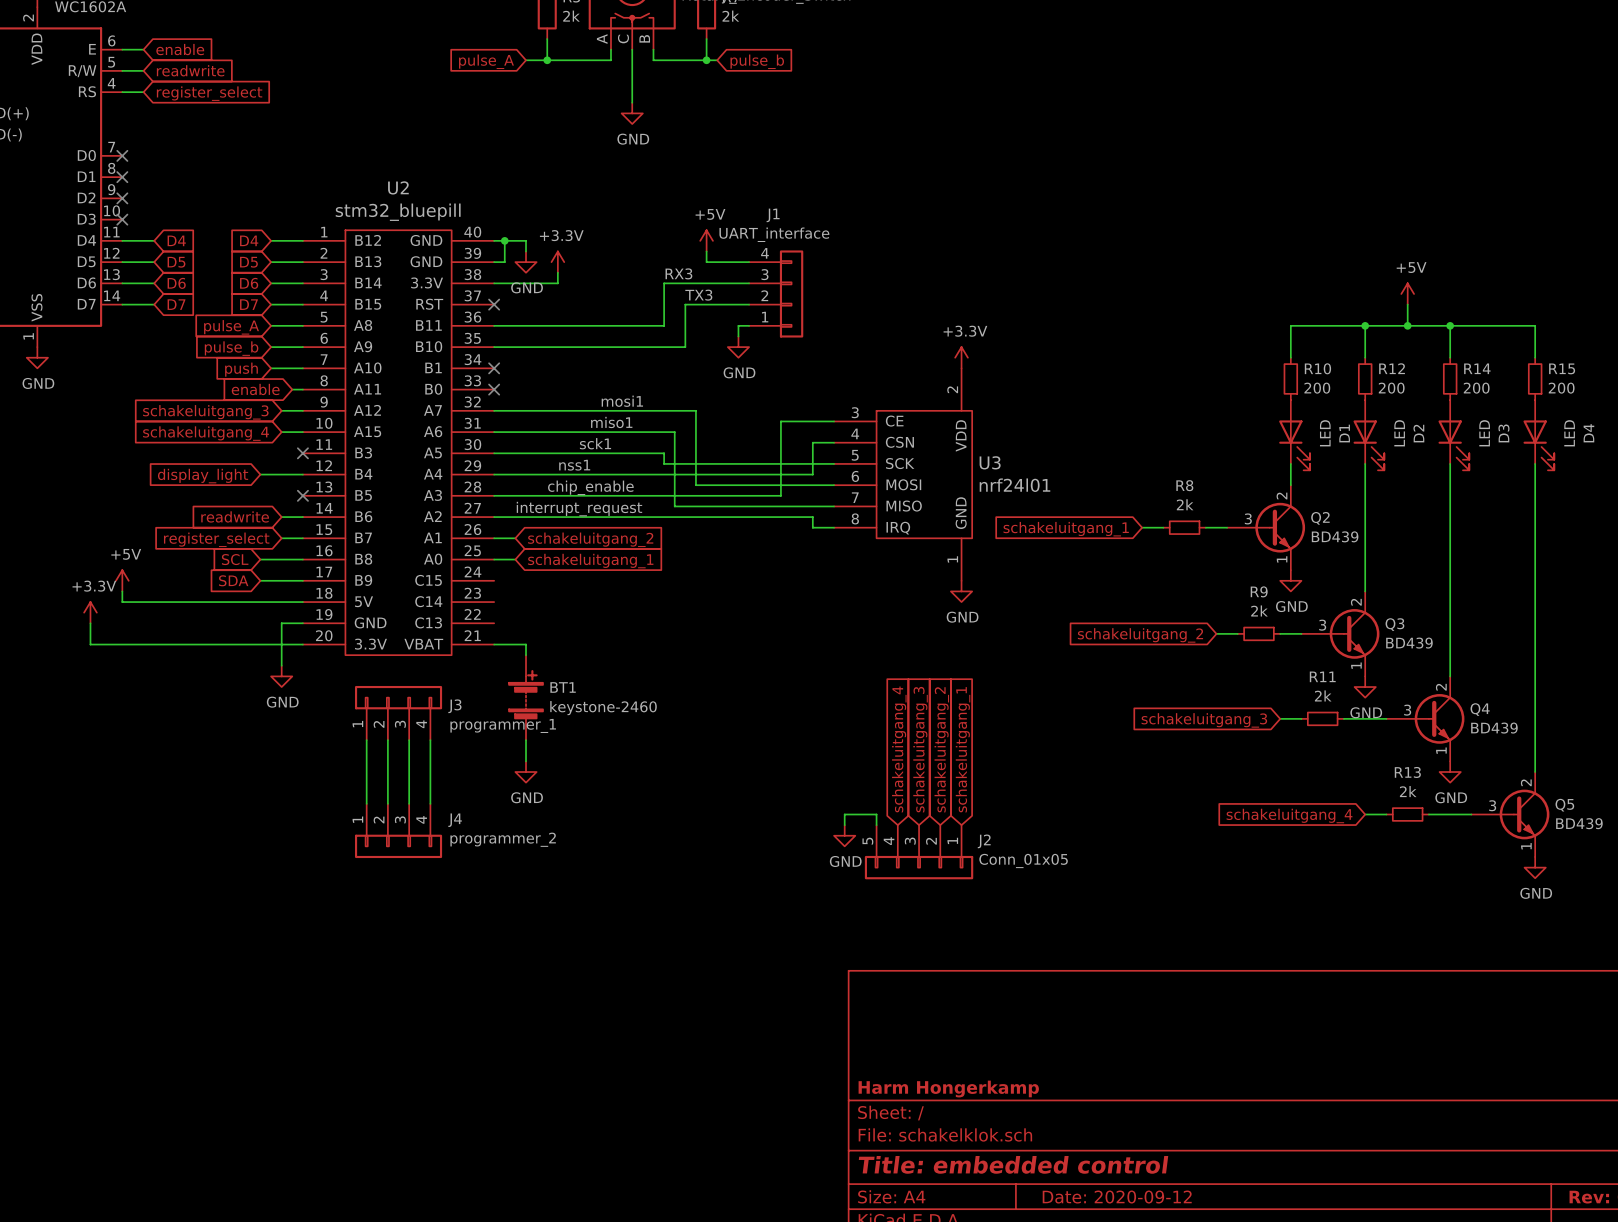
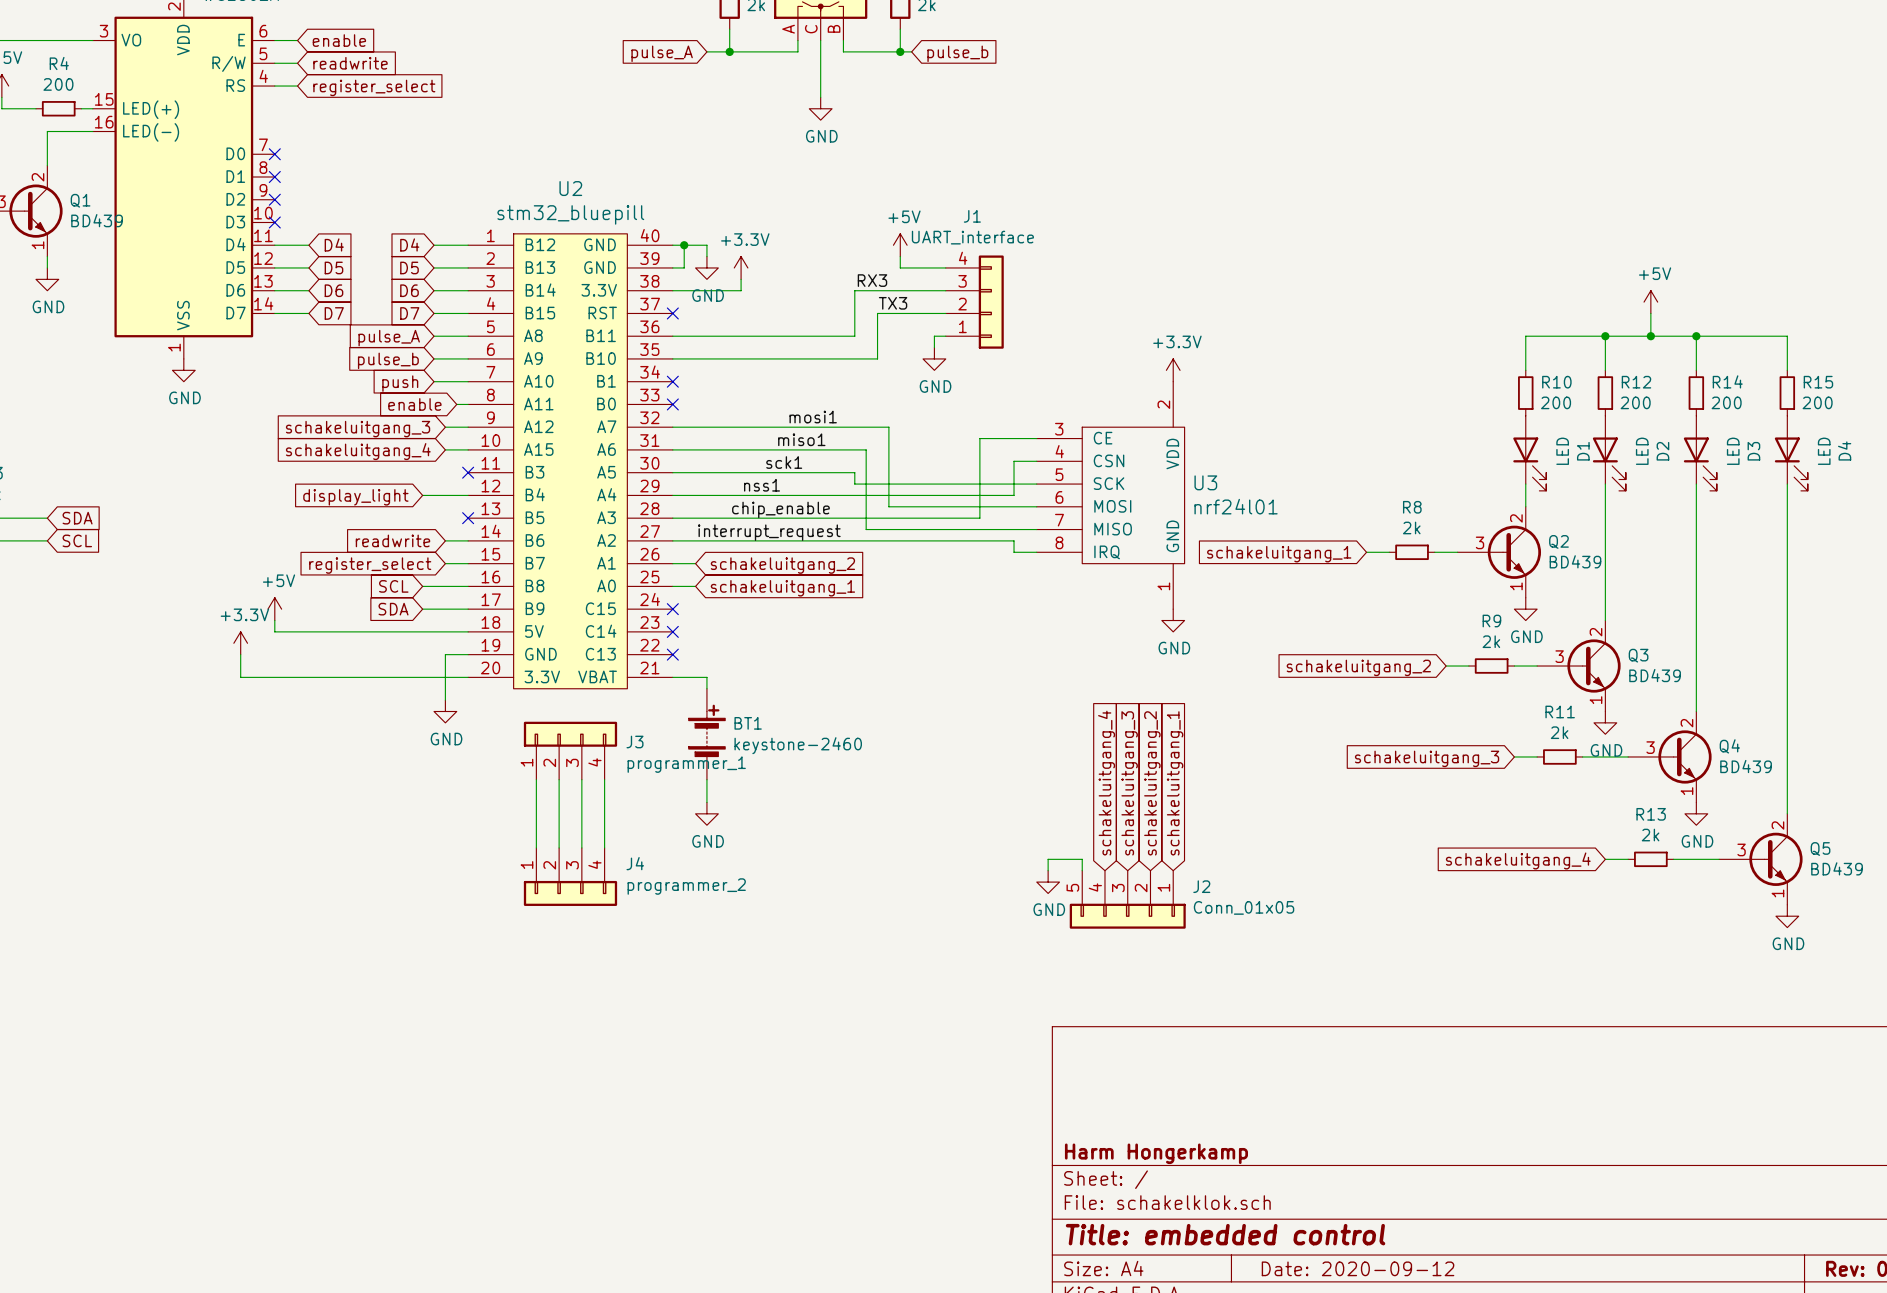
no-connect mark: none -> (672, 609)
no-connect mark: none -> (672, 631)
no-connect mark: none -> (672, 654)

